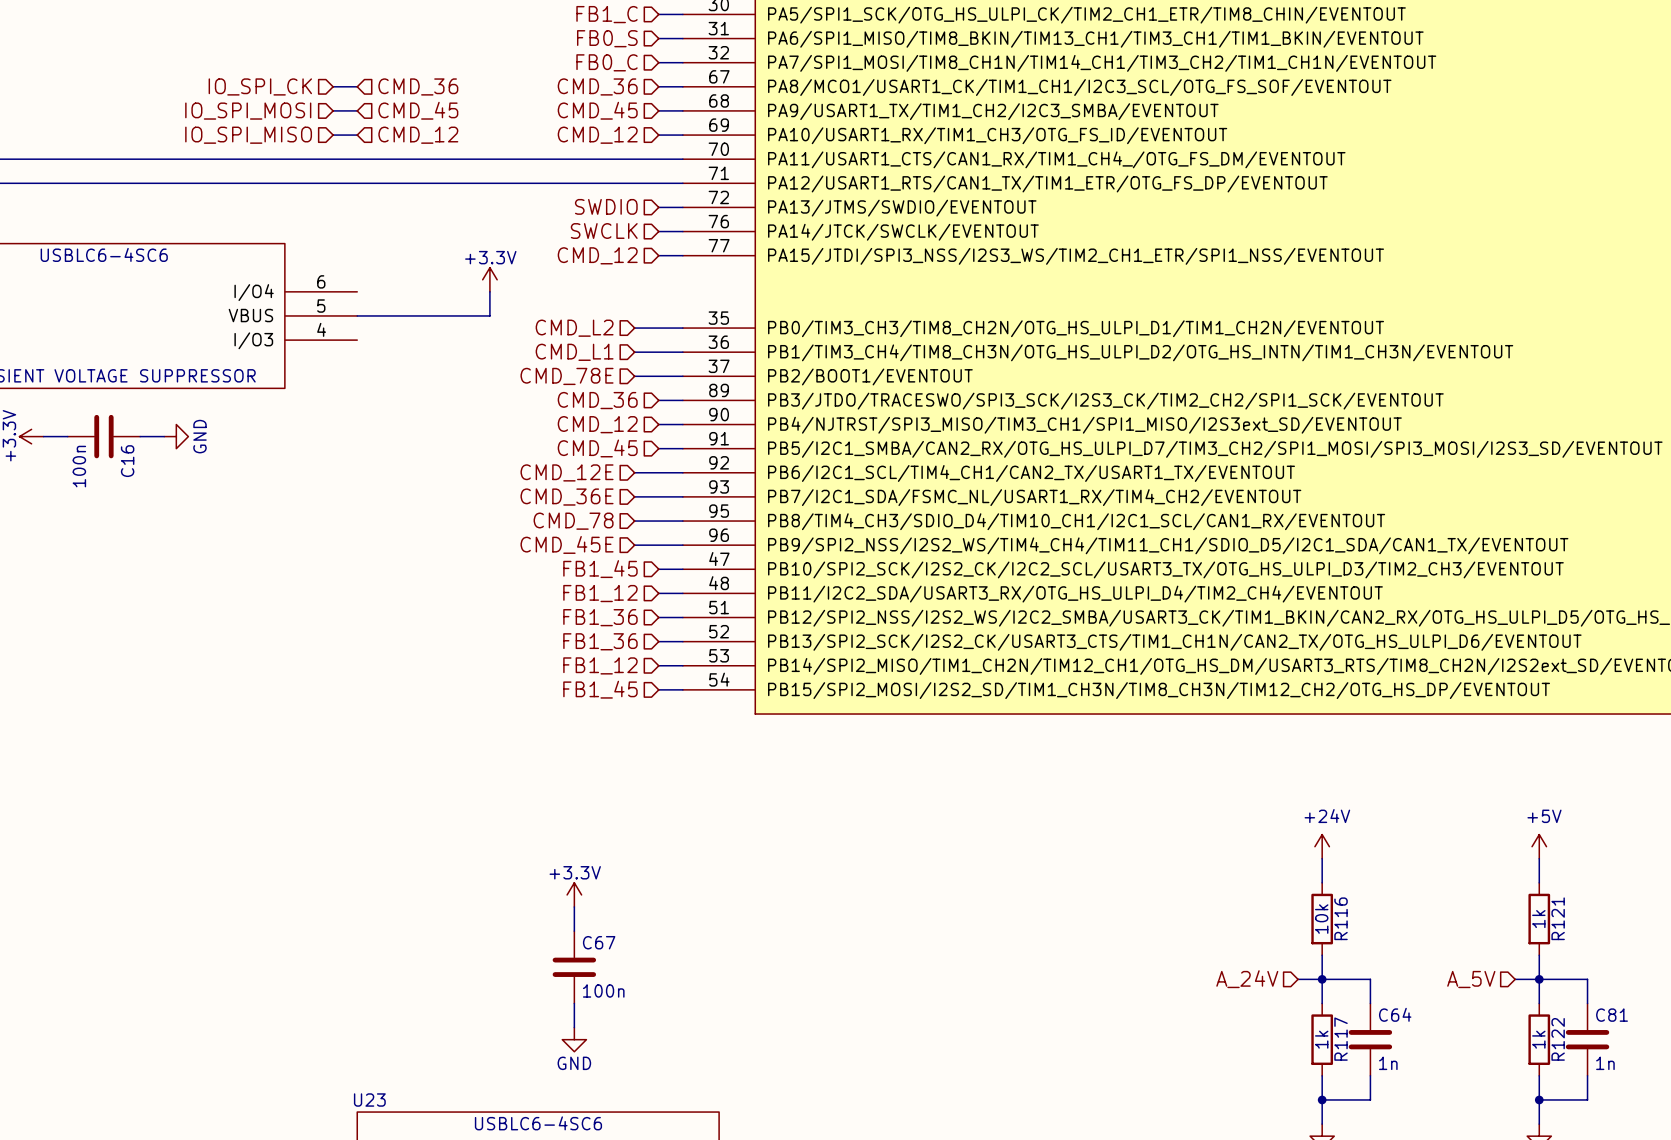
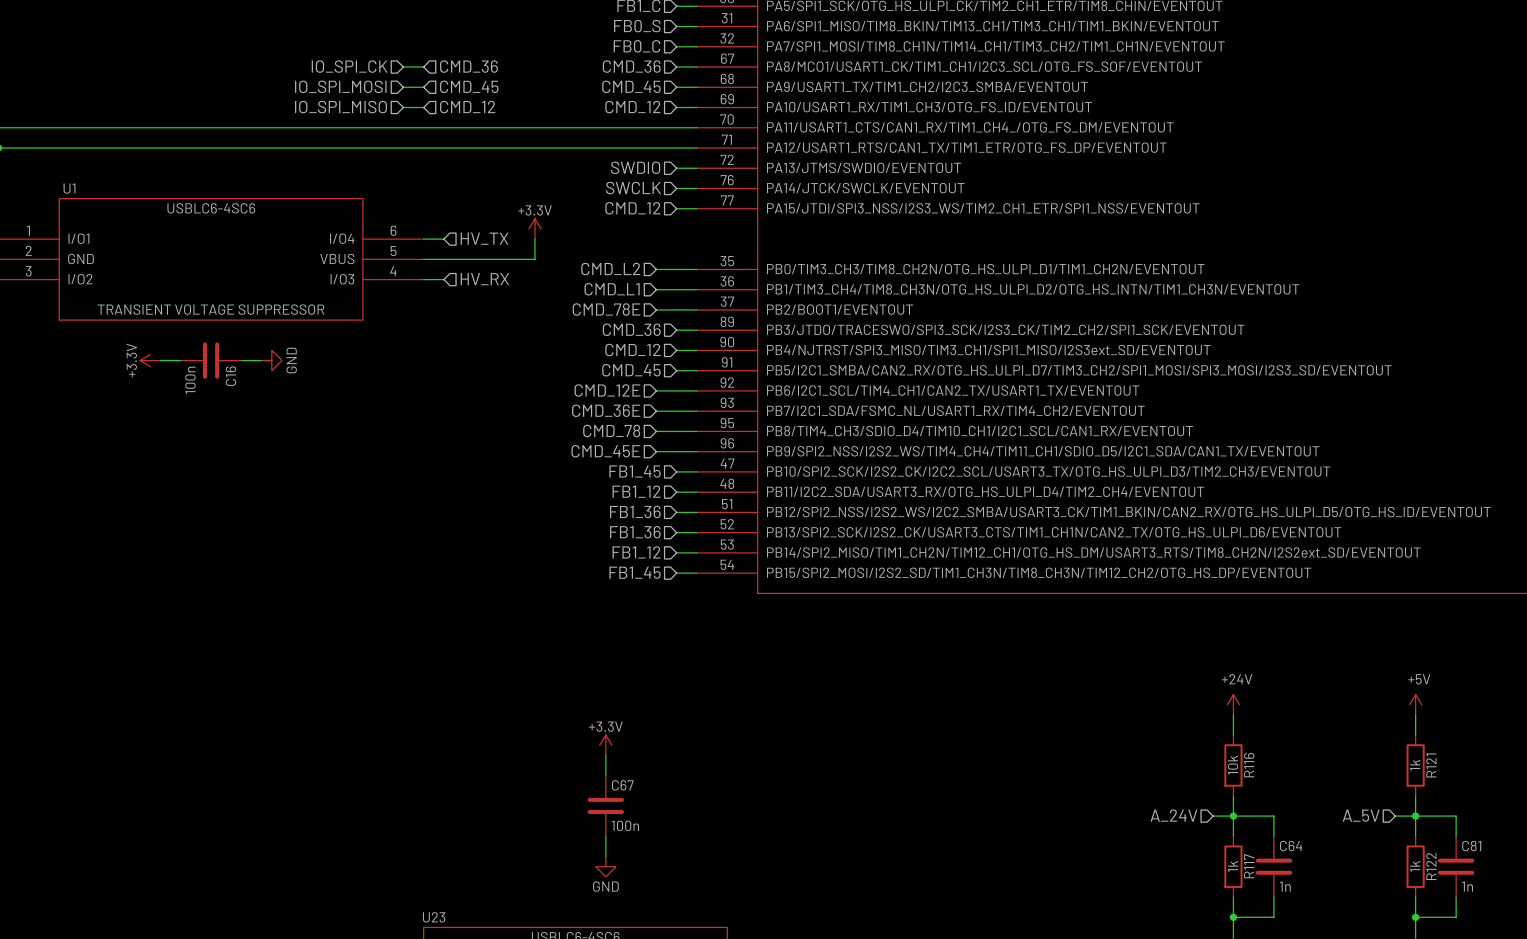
wire: none -> (423, 239) (443, 239)
hierarchical label: none -> HV_TX (484, 238)
wire: none -> (423, 279) (443, 279)
hierarchical label: none -> HV_RX (484, 279)

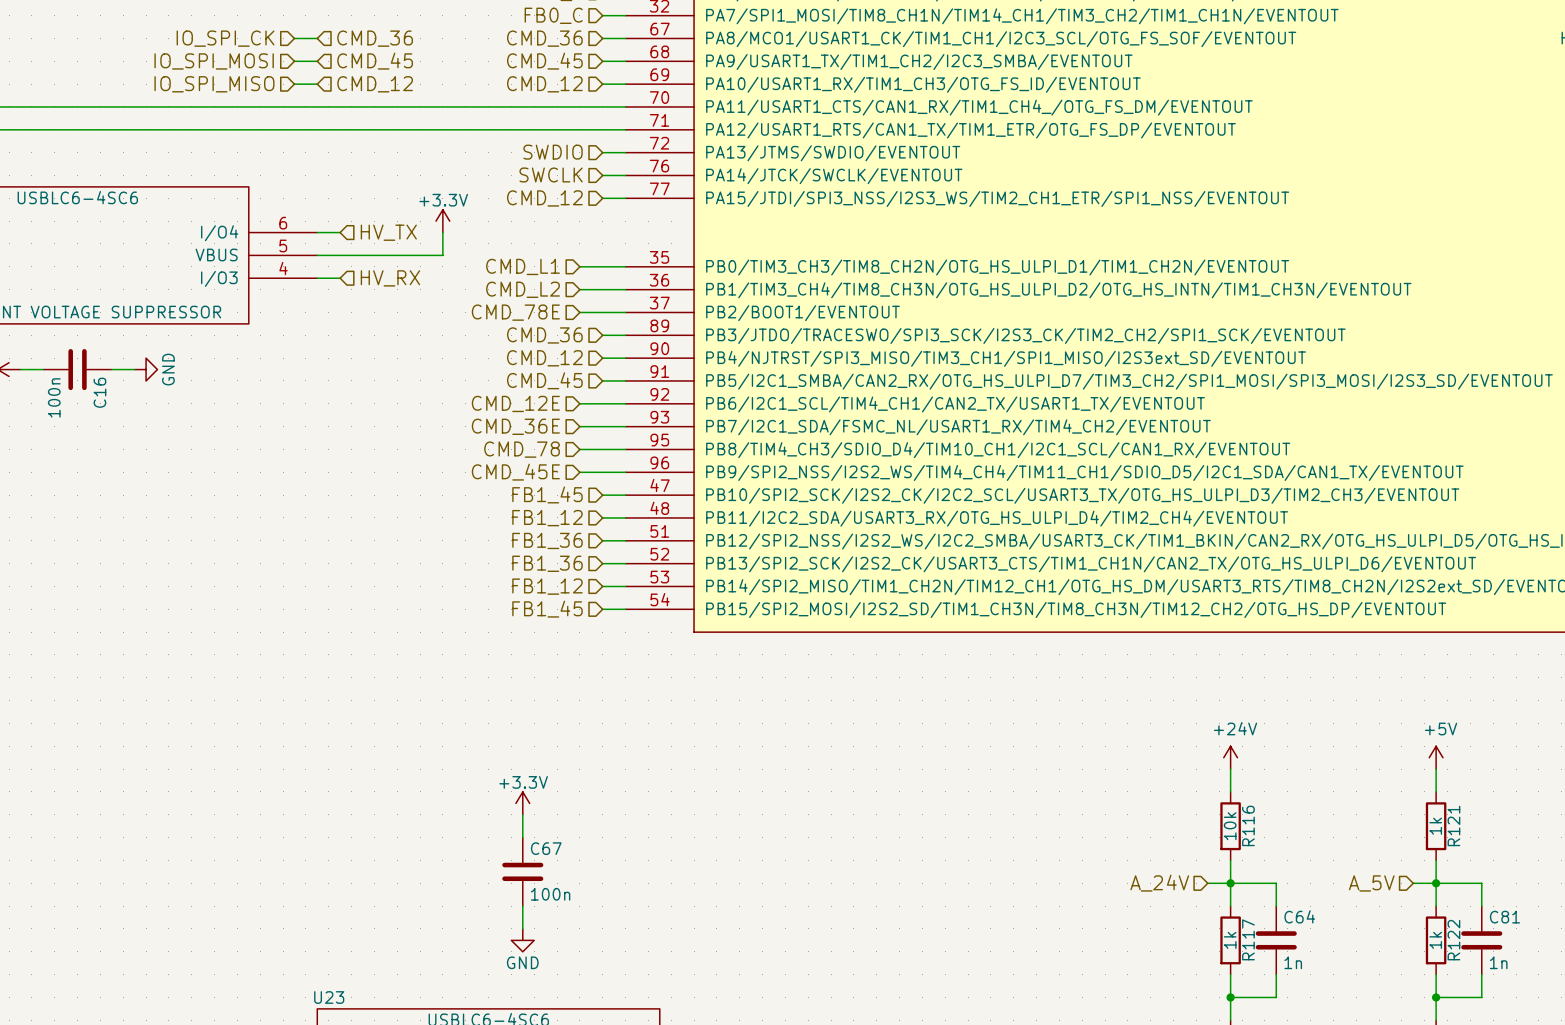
hierarchical label: CMD_L2 (610, 269) -> CMD_L1 (523, 266)
hierarchical label: CMD_L1 (612, 289) -> CMD_L2 (523, 289)

